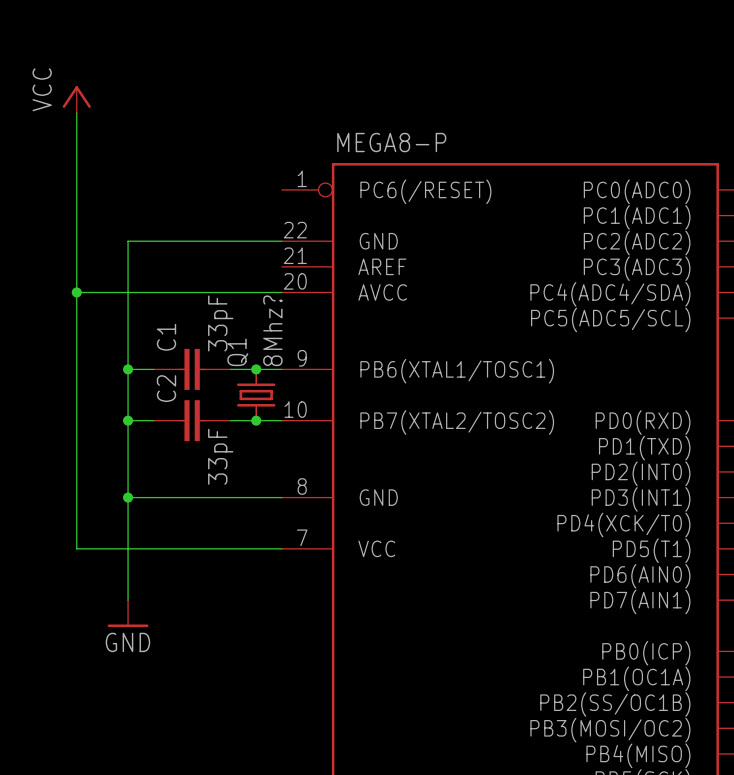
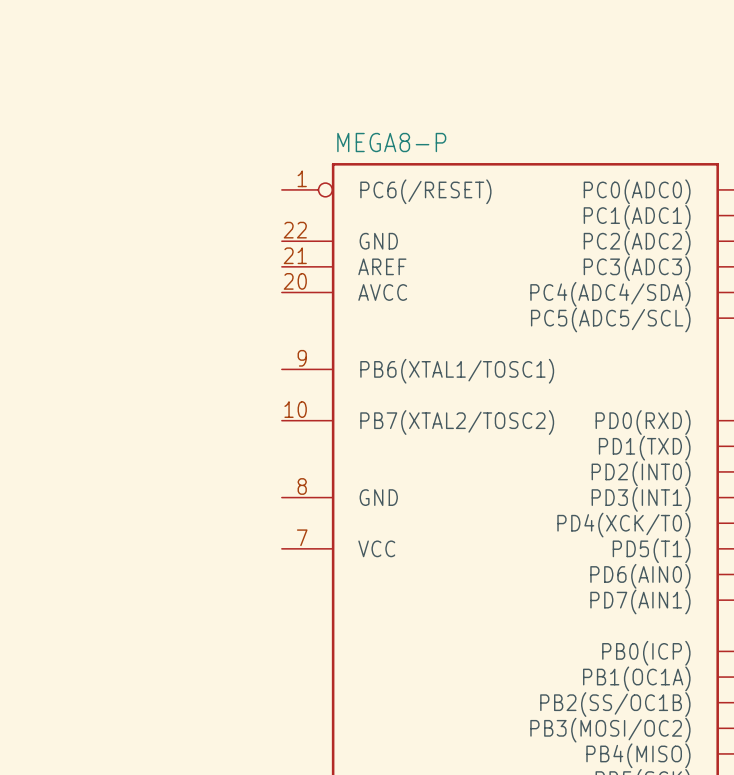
power symbol: VCC (76, 99) -> none
wire: (76, 113) (76, 548) (281, 548) -> none
wire: (281, 241) (128, 241) (128, 600) -> none
wire: (76, 292) (281, 292) -> none
junction: (76, 292) -> none
wire: (128, 369) (153, 369) -> none
junction: (128, 369) -> none
C1: 33pF (192, 369) -> none
wire: (230, 369) (281, 369) -> none
junction: (256, 369) -> none
Q1: 8Mhz? (256, 395) -> none
wire: (128, 420) (153, 420) -> none
junction: (128, 420) -> none
C2: 33pF (192, 420) -> none
wire: (230, 420) (281, 420) -> none
junction: (256, 420) -> none
wire: (128, 497) (281, 497) -> none
junction: (128, 497) -> none
power symbol: GND (128, 613) -> none

